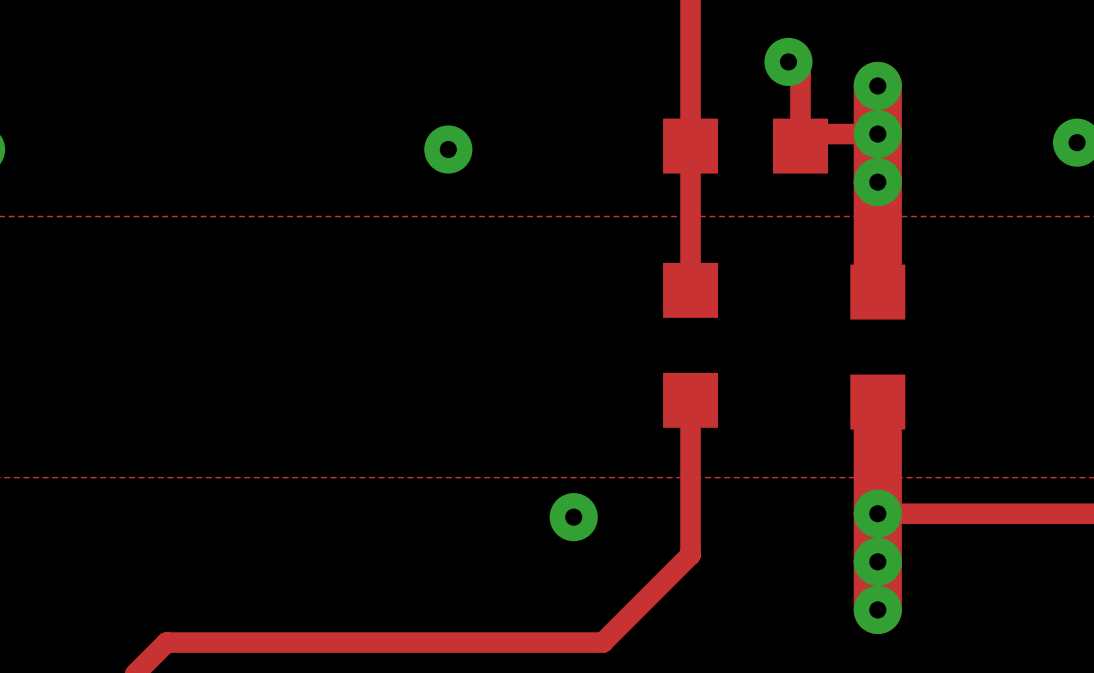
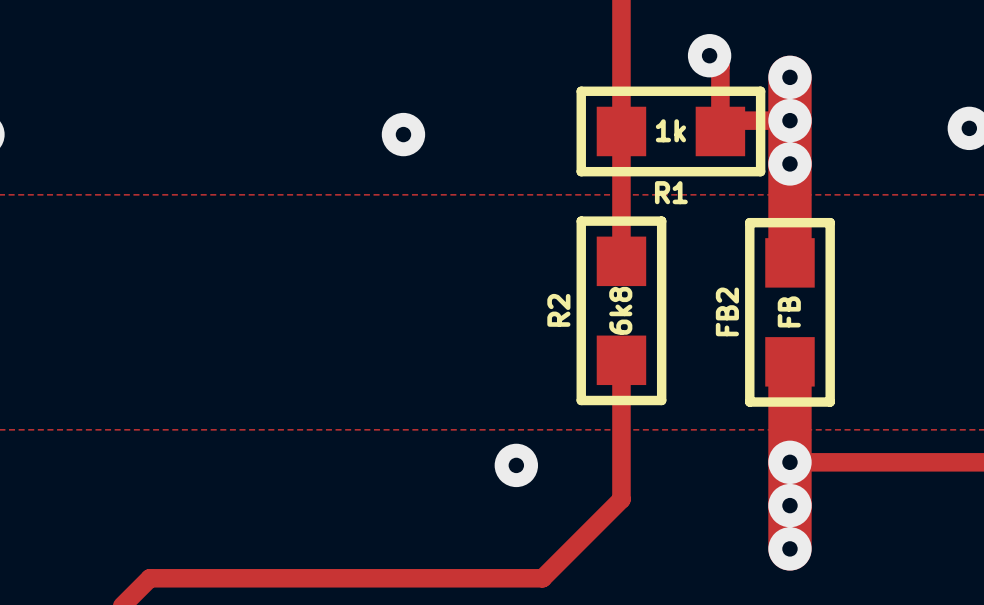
R1: none -> 1k (670, 131)
part: (690, 345) -> none
R2: none -> 6k8 (621, 310)
FB2: none -> FB (789, 312)

